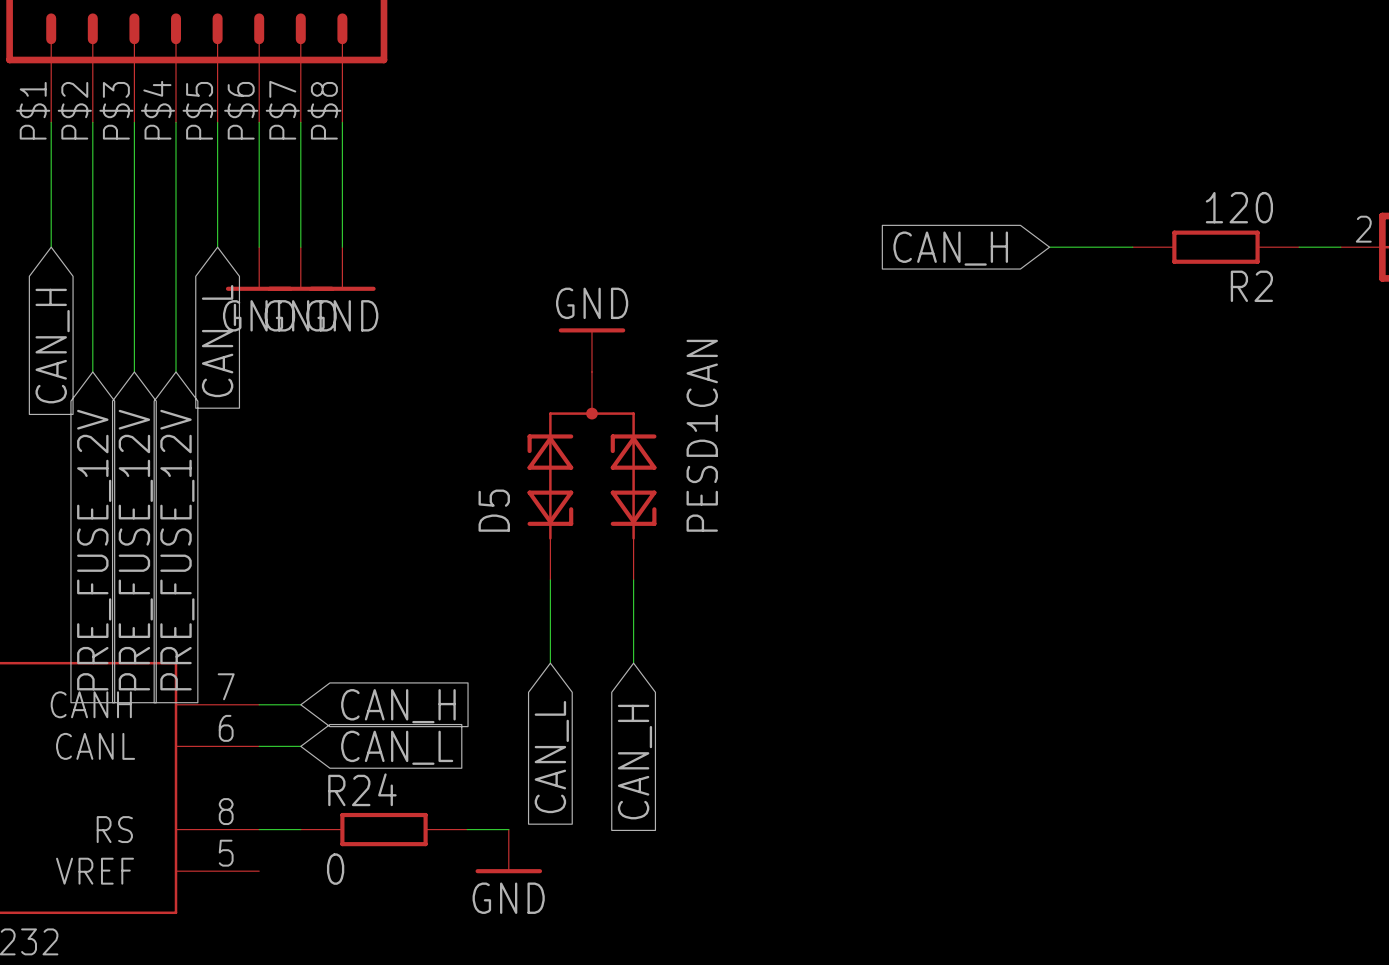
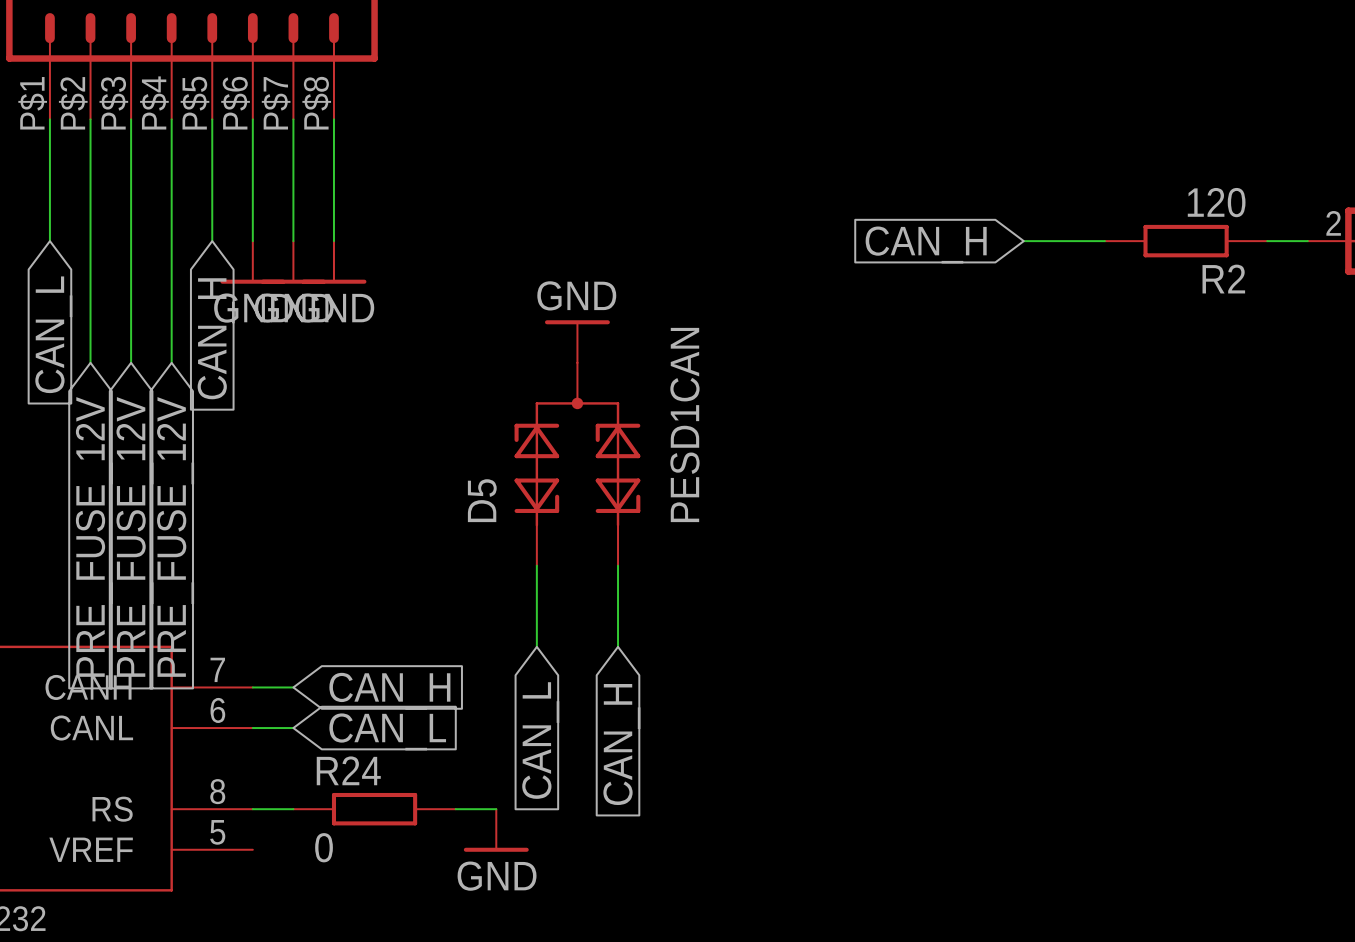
global label: CAN_L (218, 341) -> CAN_H (216, 338)
global label: CAN_H (52, 346) -> CAN_L (53, 334)

